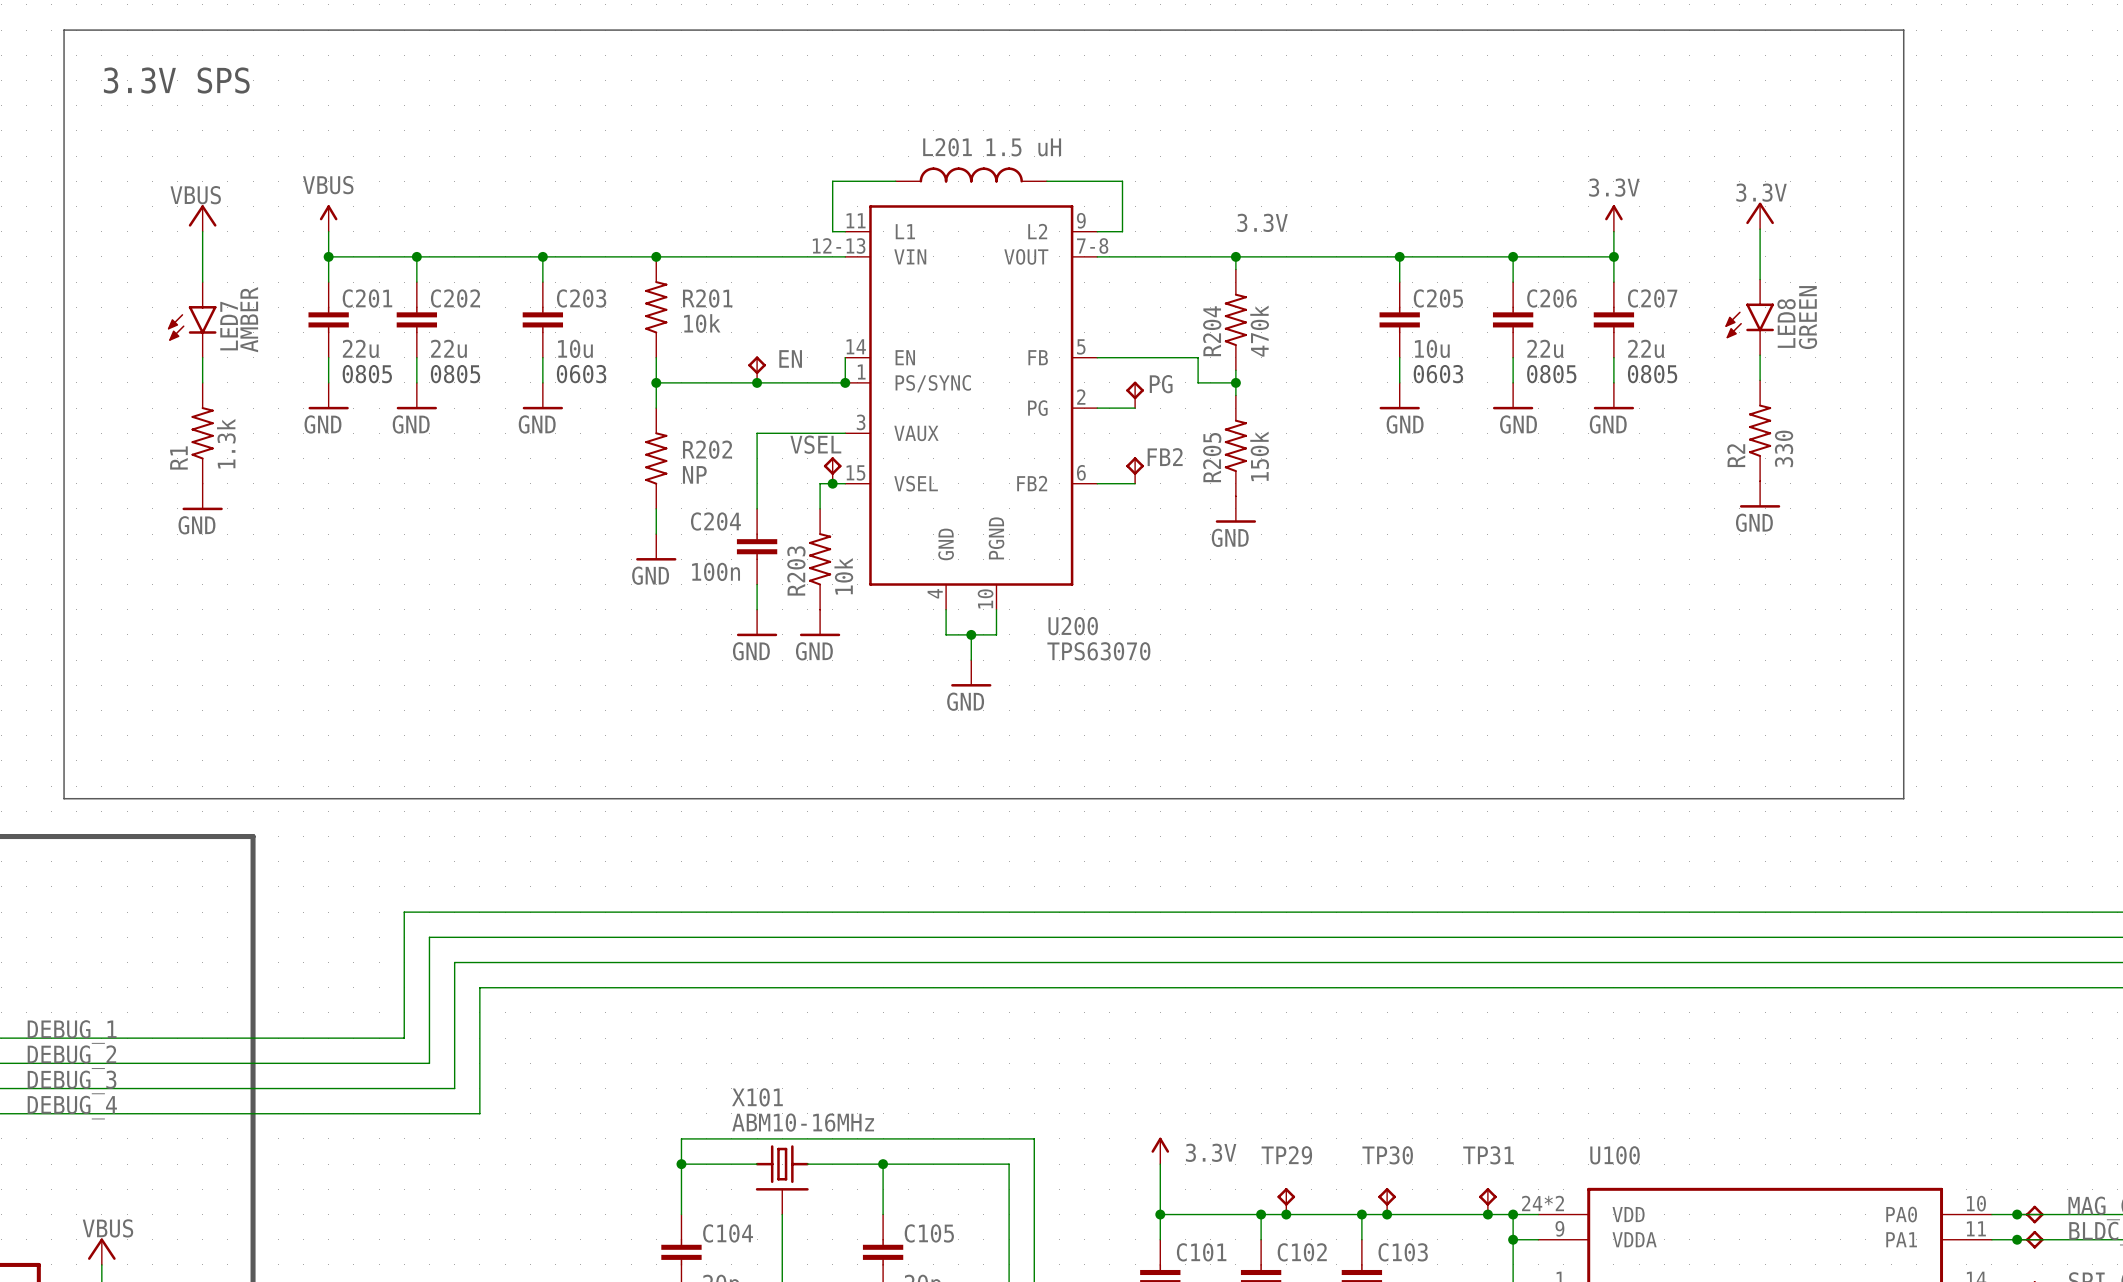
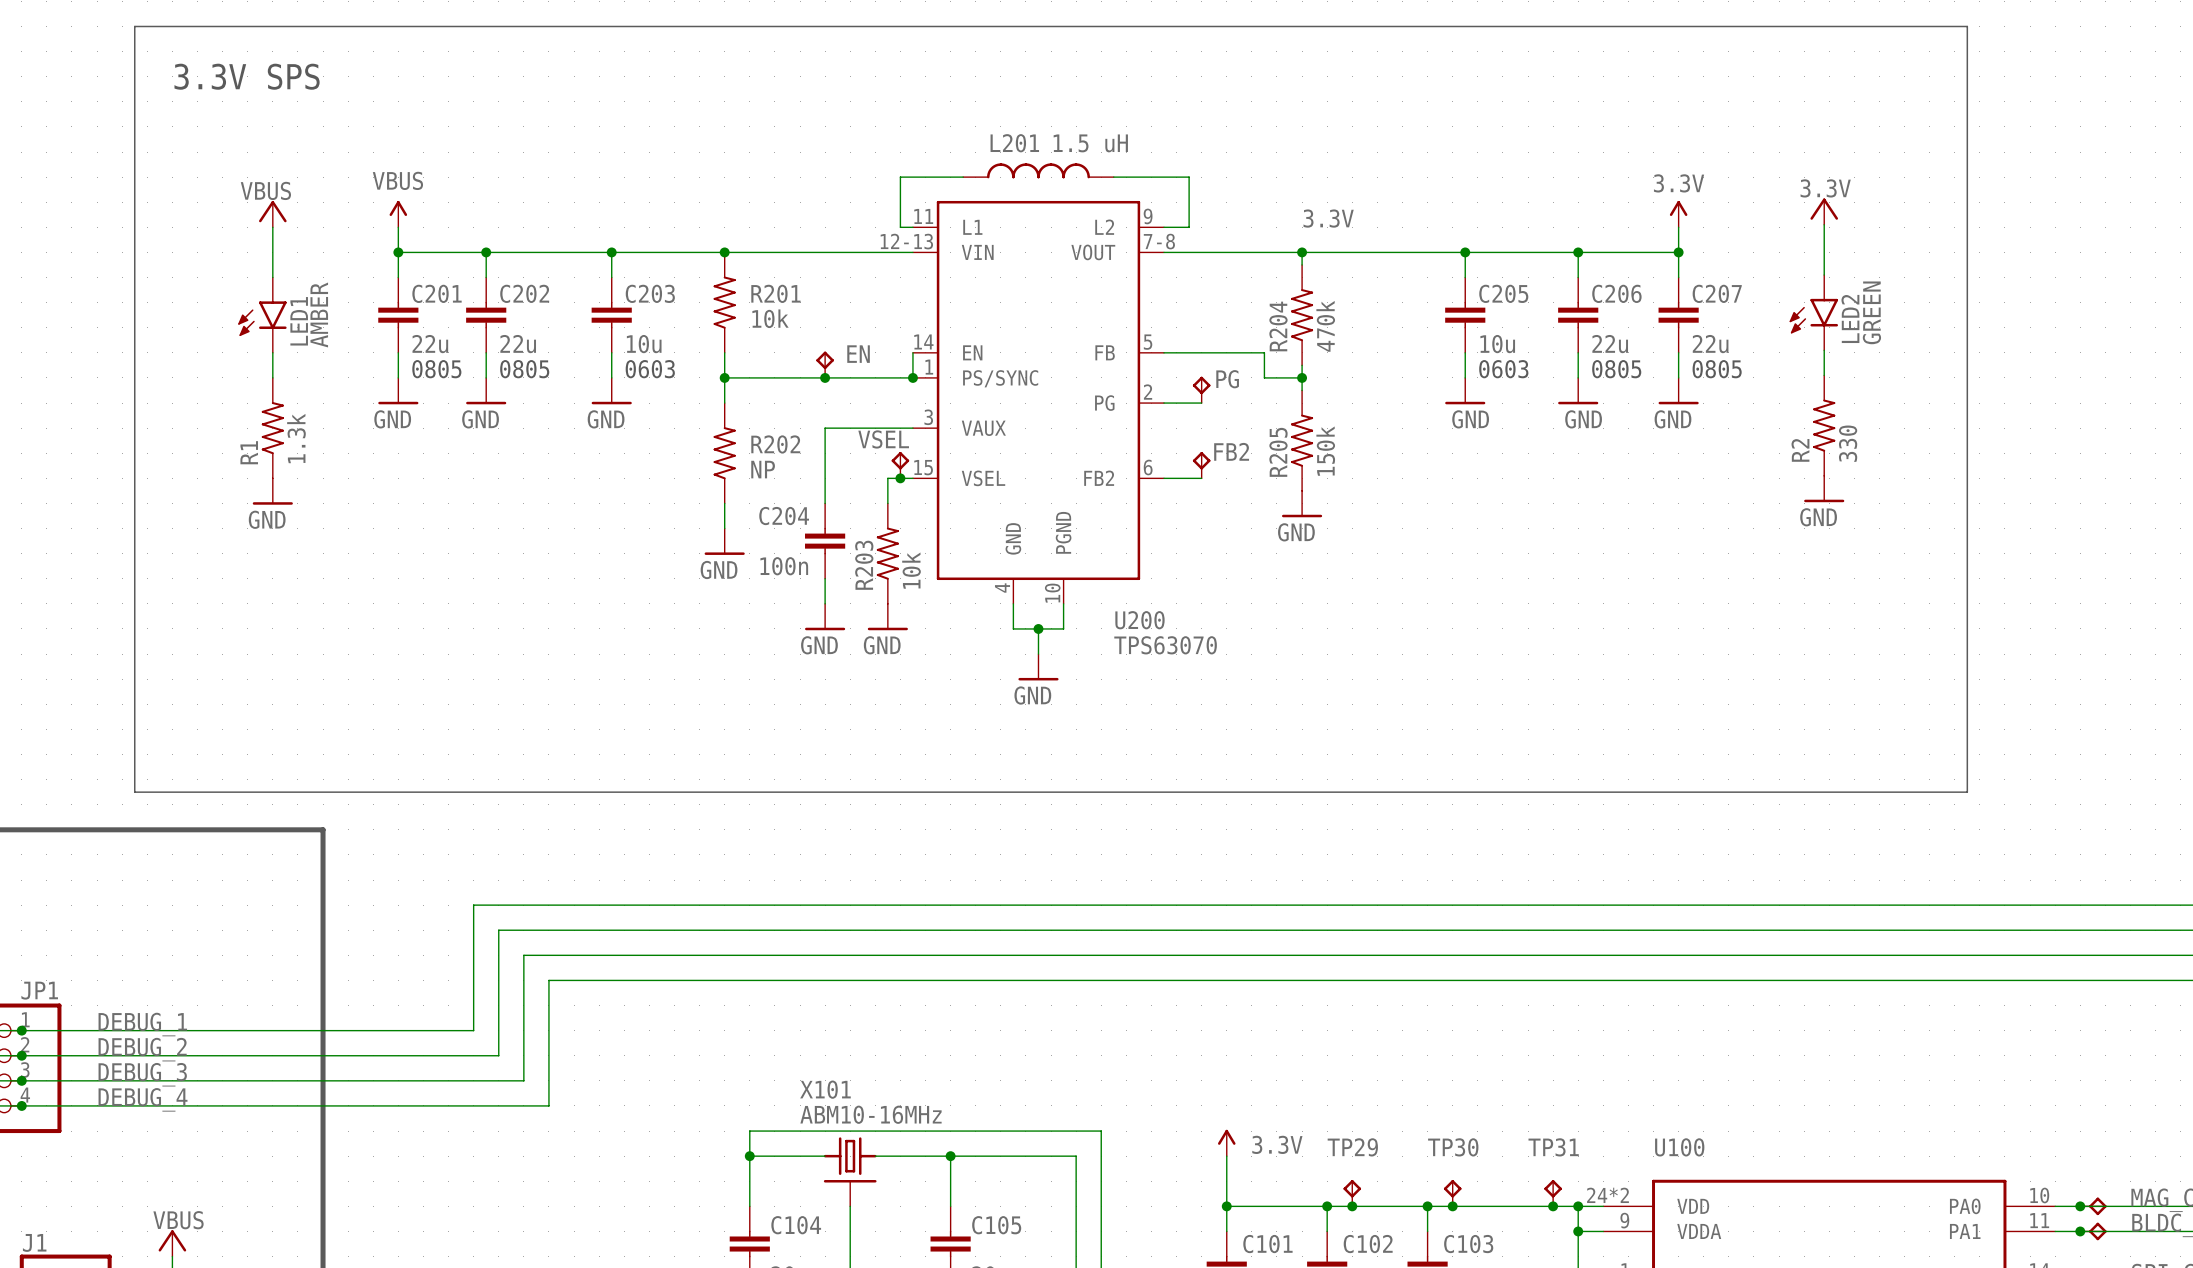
LED8 name: LED8 (1786, 323) -> LED2 (1850, 318)
LED7 name: LED7 (229, 326) -> LED1 (299, 321)

